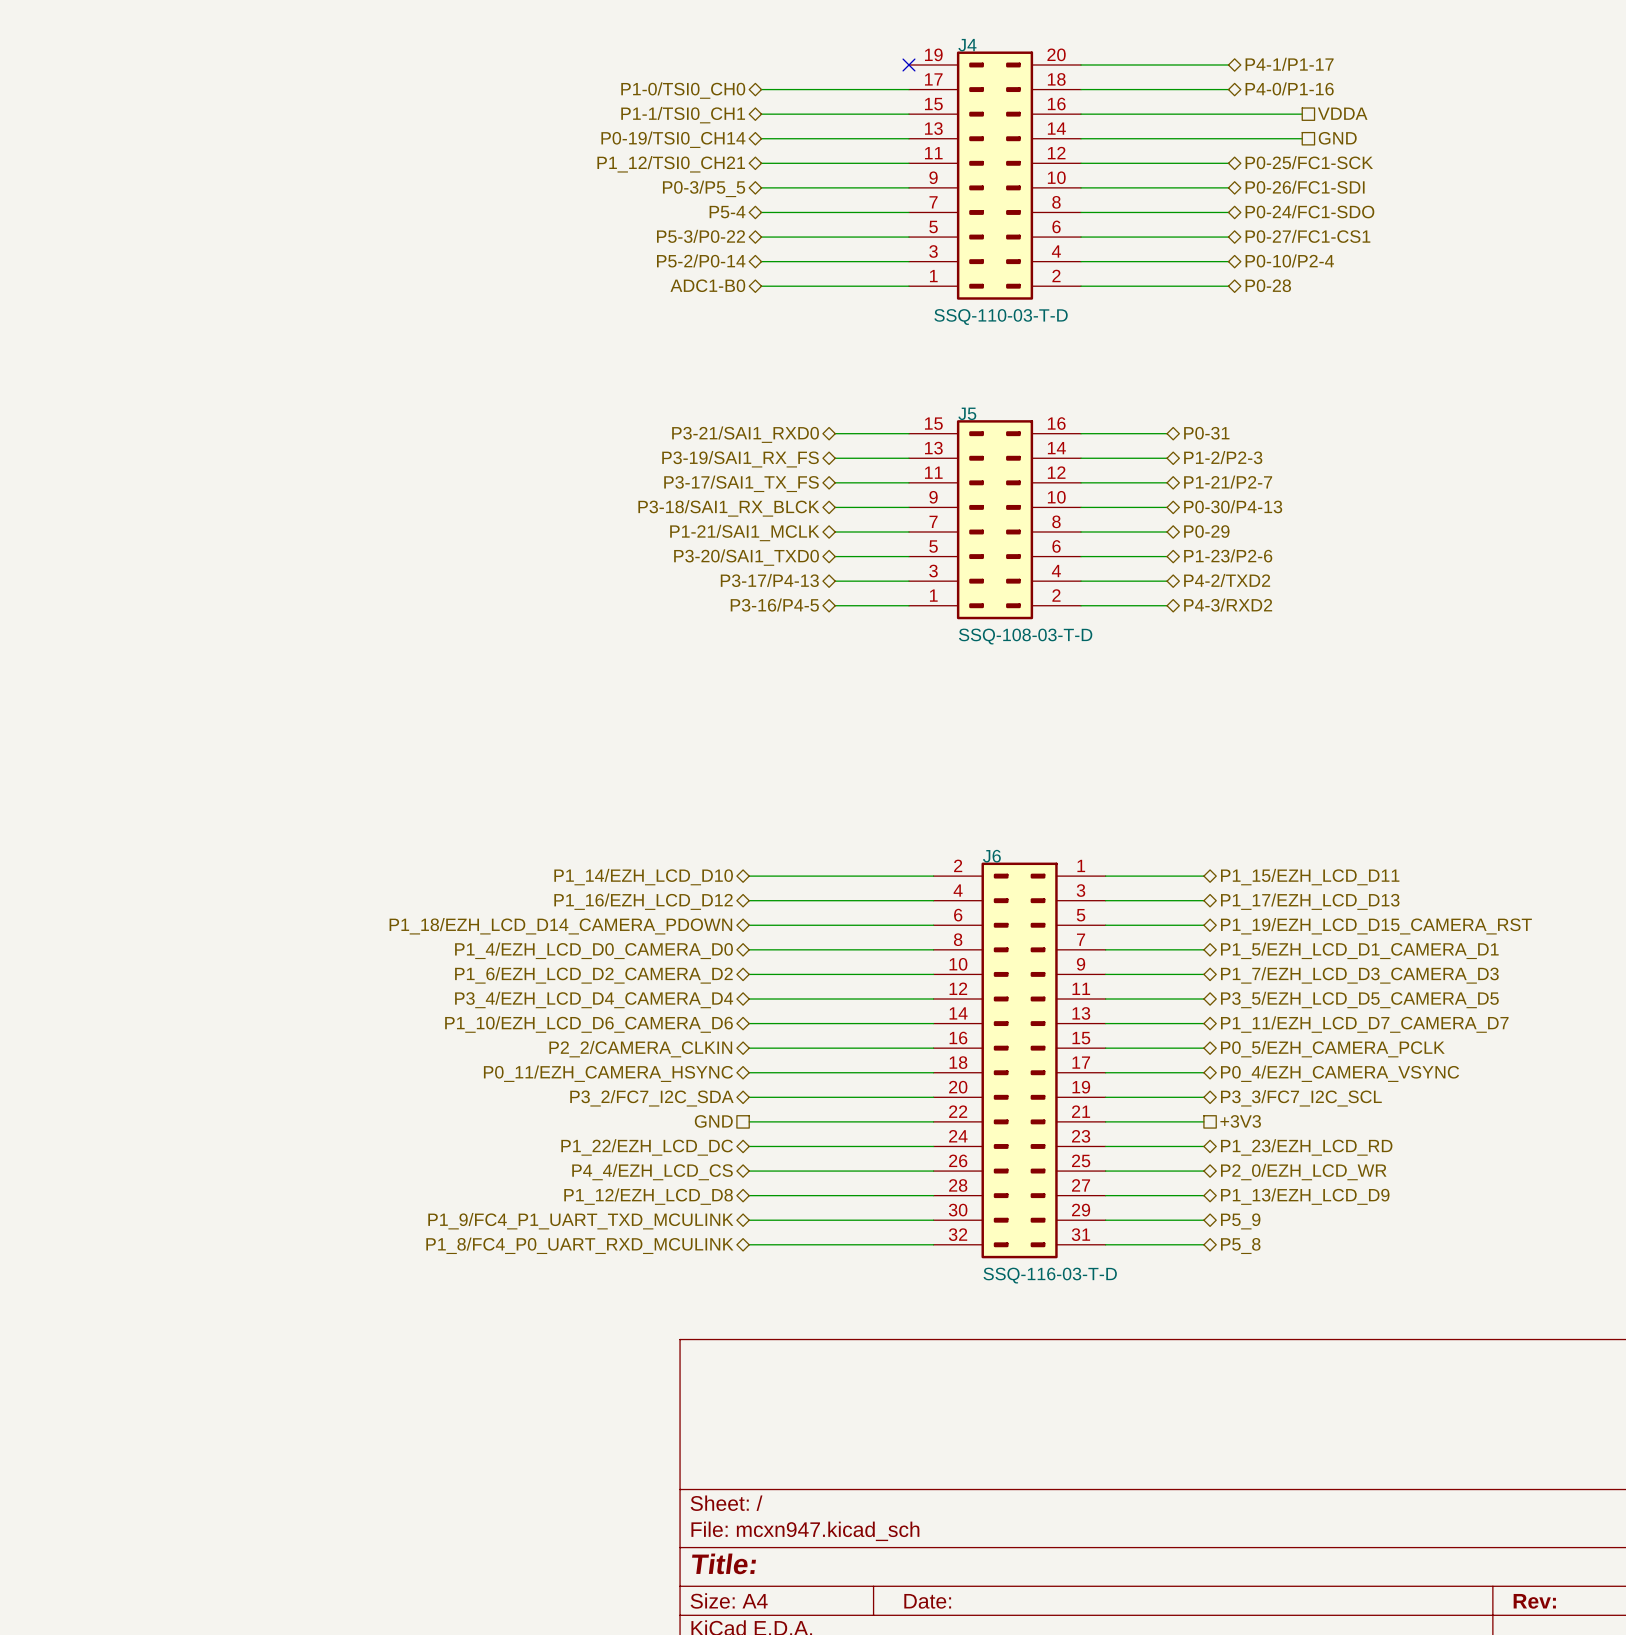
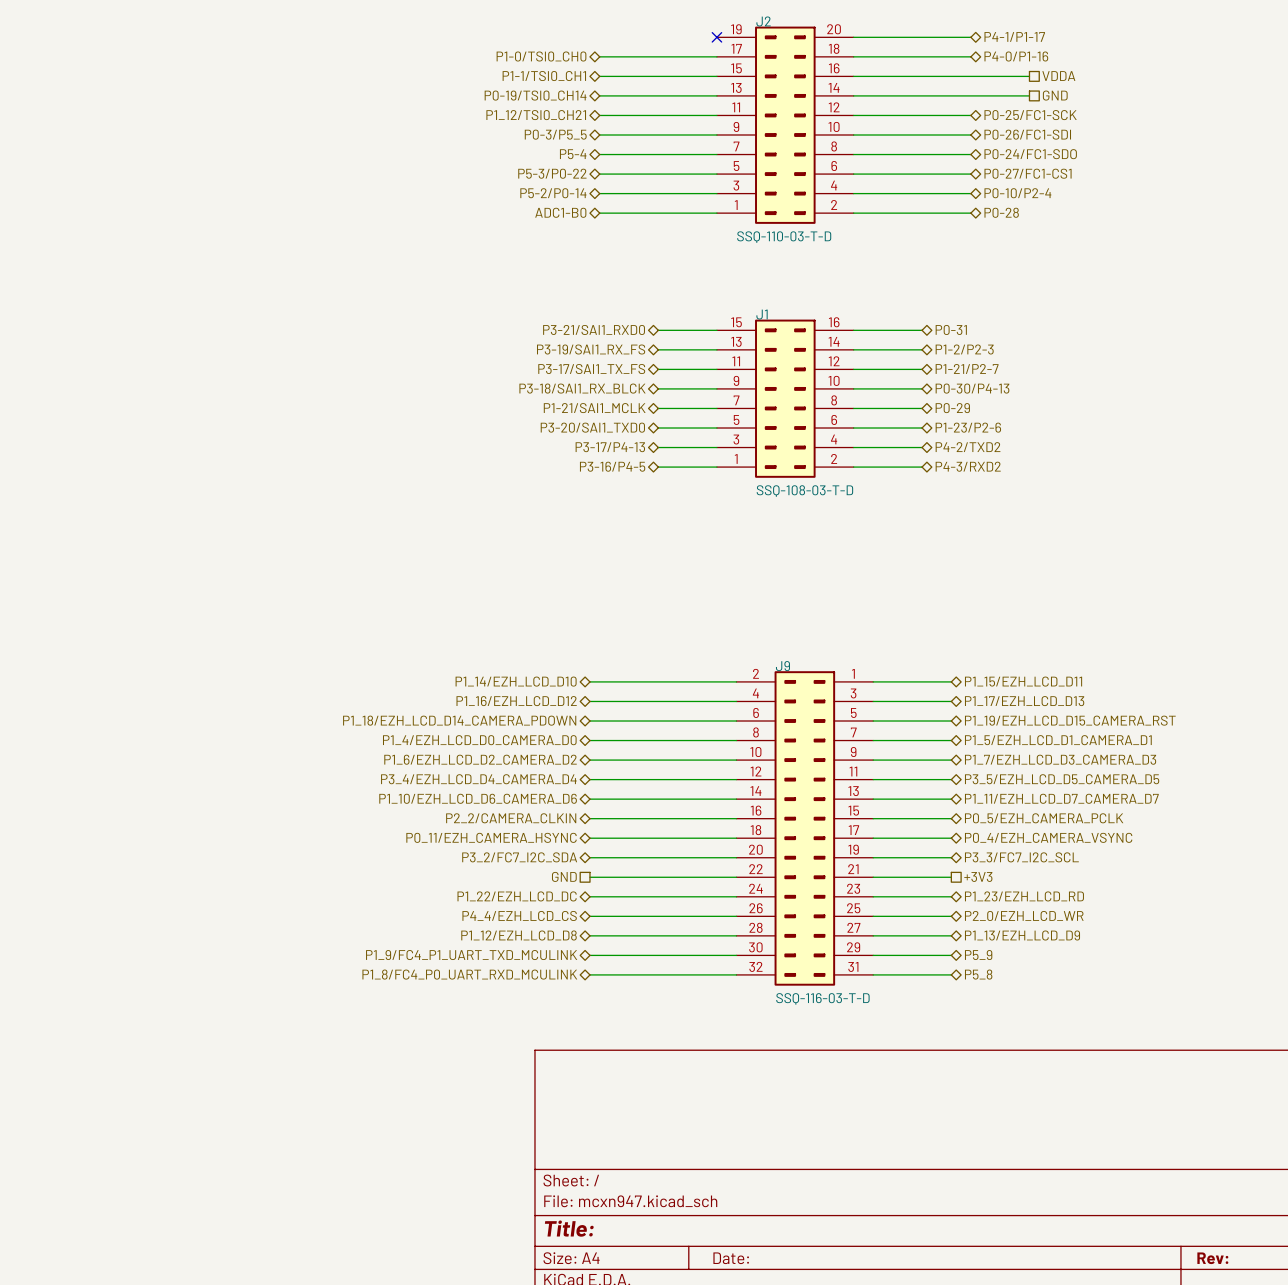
J4 name: J4 (967, 45) -> J2 (763, 21)
J5 name: J5 (967, 413) -> J1 (762, 314)
J6 name: J6 (991, 856) -> J9 (782, 666)

